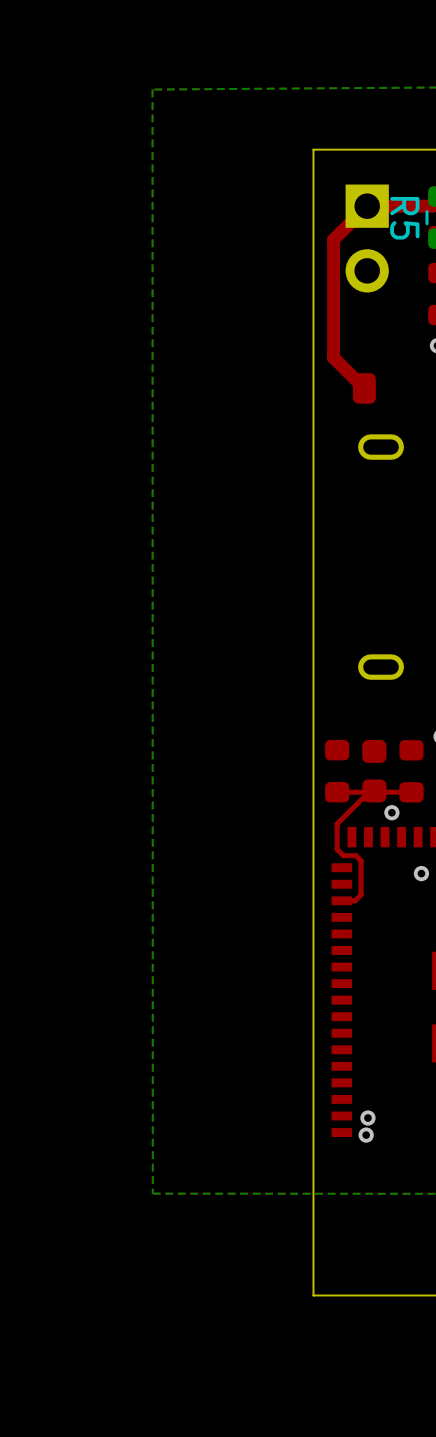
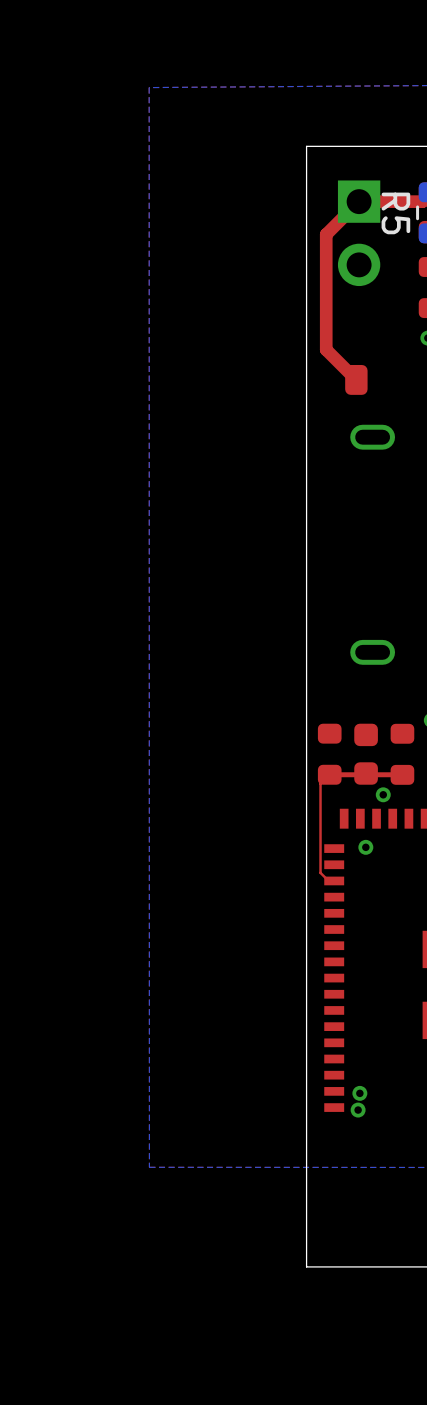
top track: (370, 790) (337, 823) (337, 849) (343, 855) (355, 855) (361, 860) (361, 894) (355, 900) (341, 900) -> (329, 774) (320, 783) (320, 872) (328, 880) (334, 880)
via position: (421, 873) -> (365, 847)

